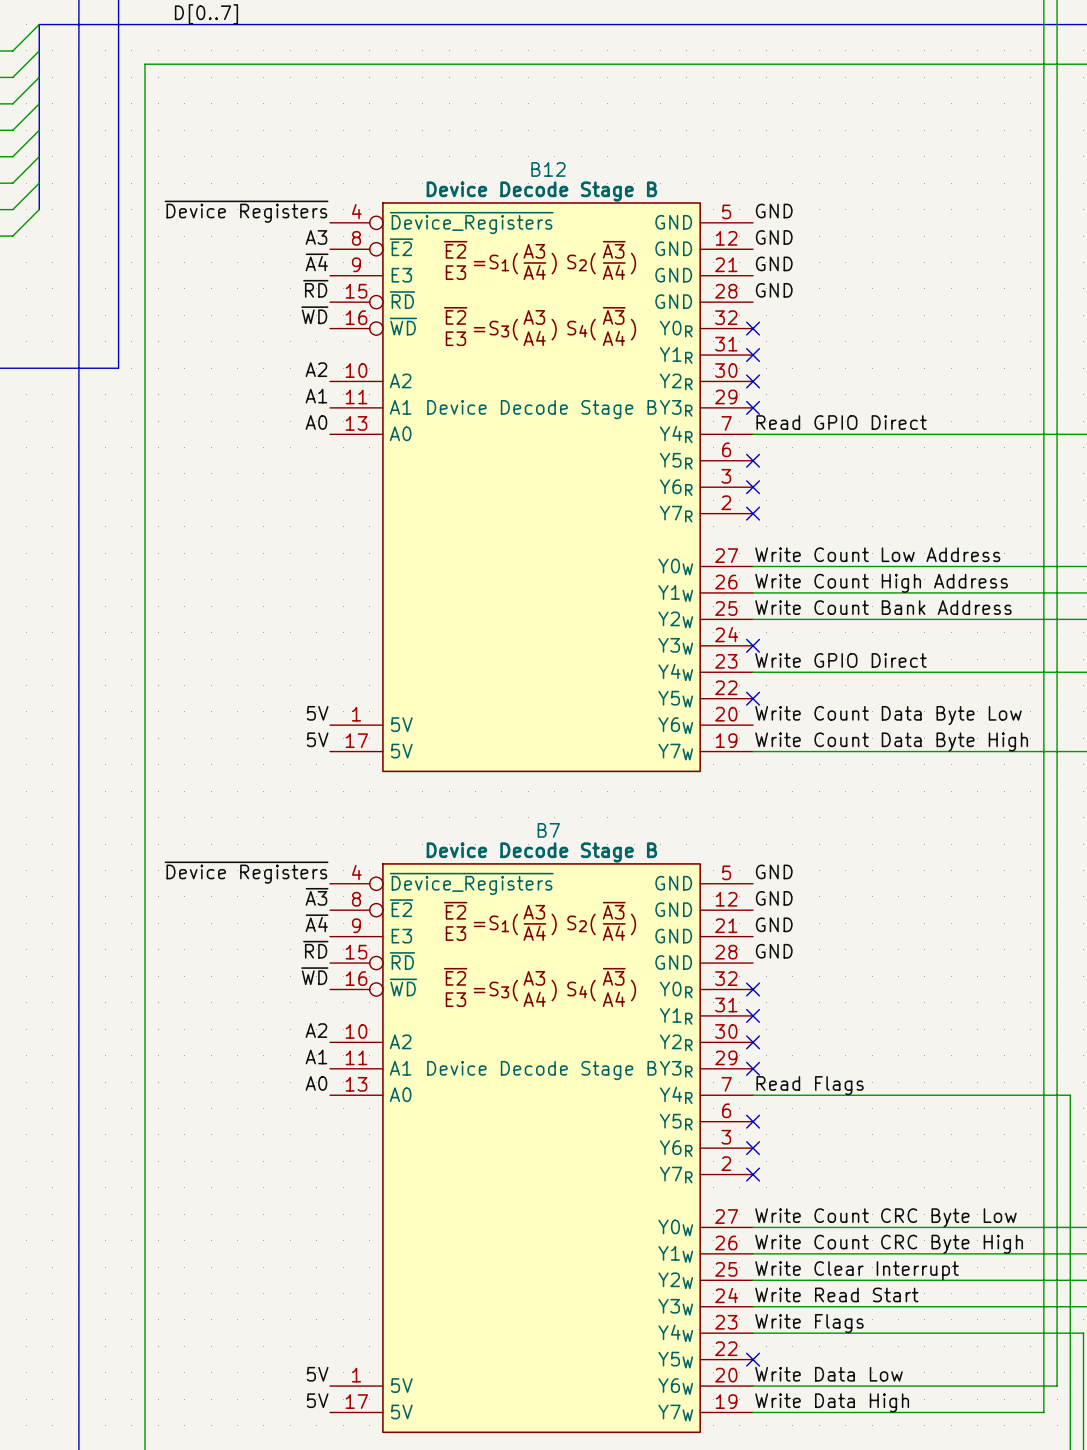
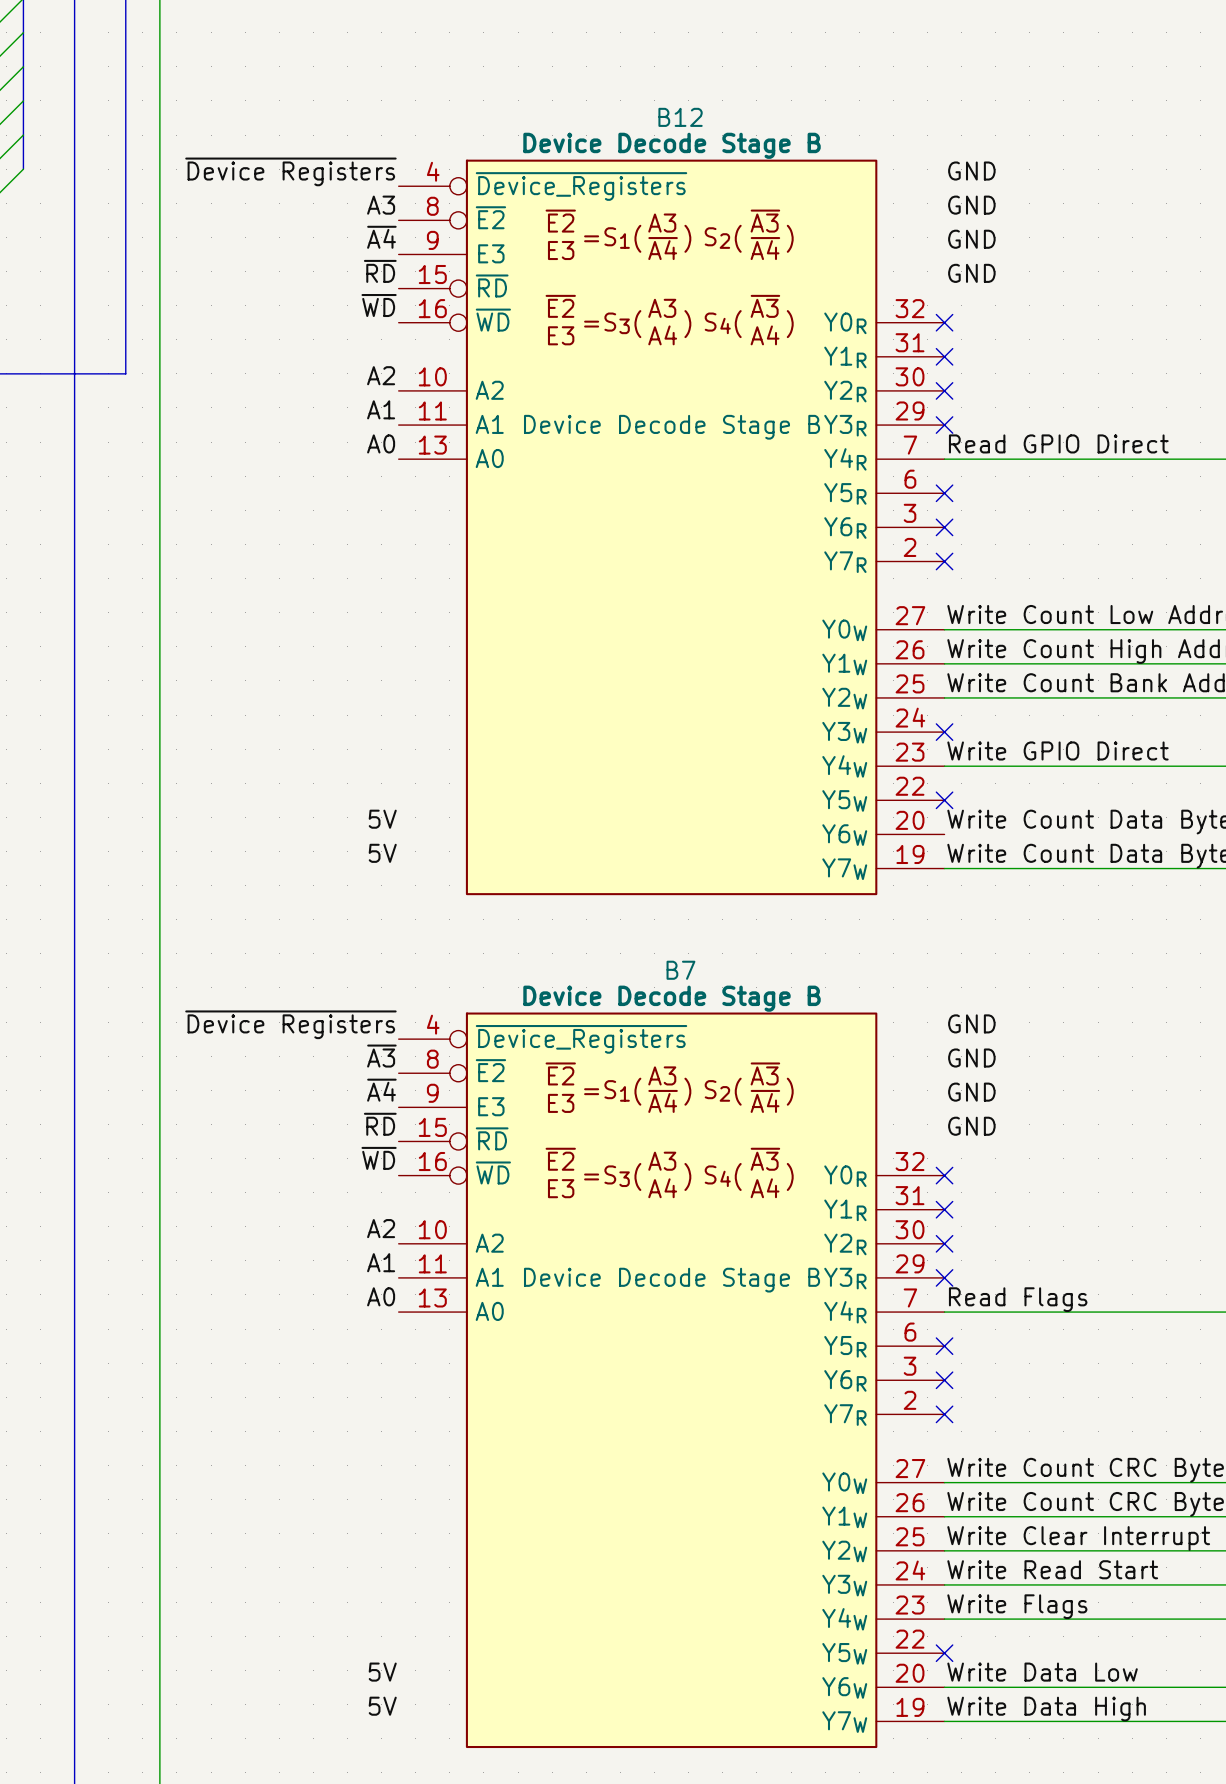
B12 symbol: [330, 202, 754, 773] -> [398, 159, 945, 896]
B7 symbol: [330, 863, 754, 1434] -> [398, 1012, 945, 1749]

